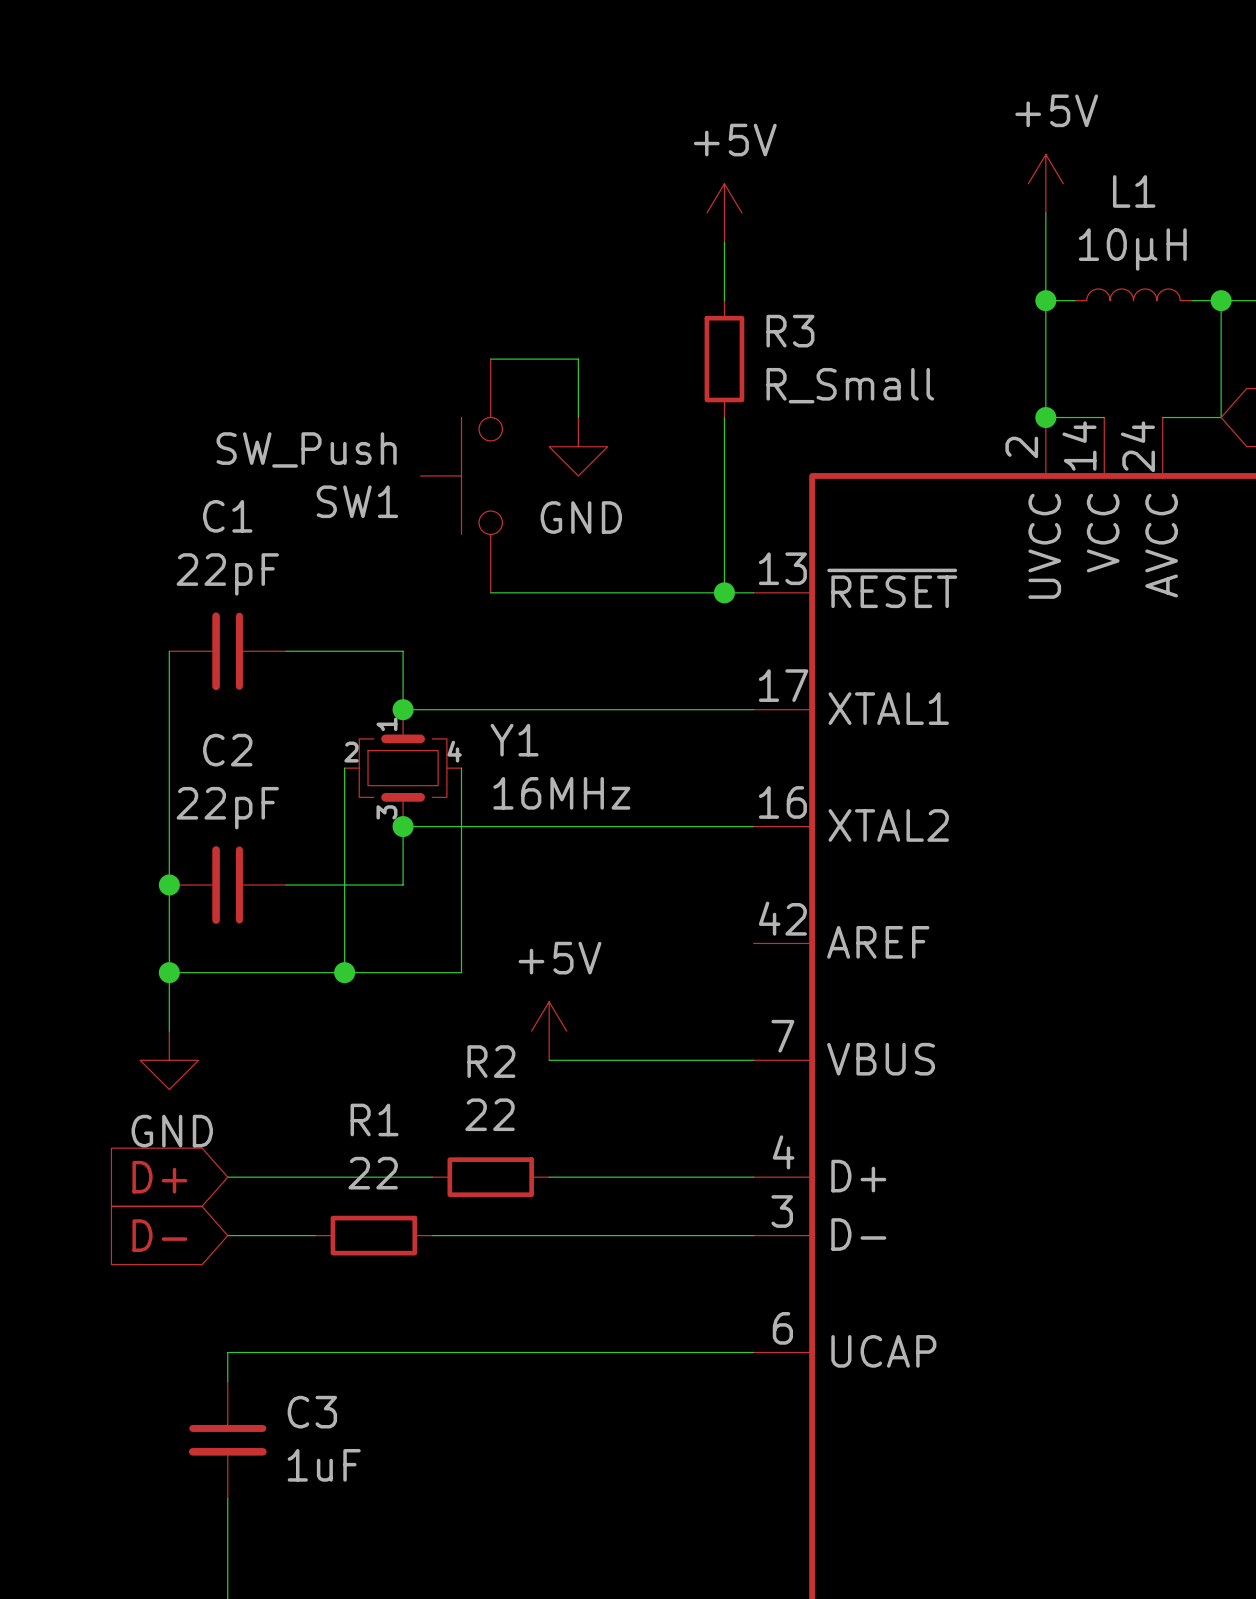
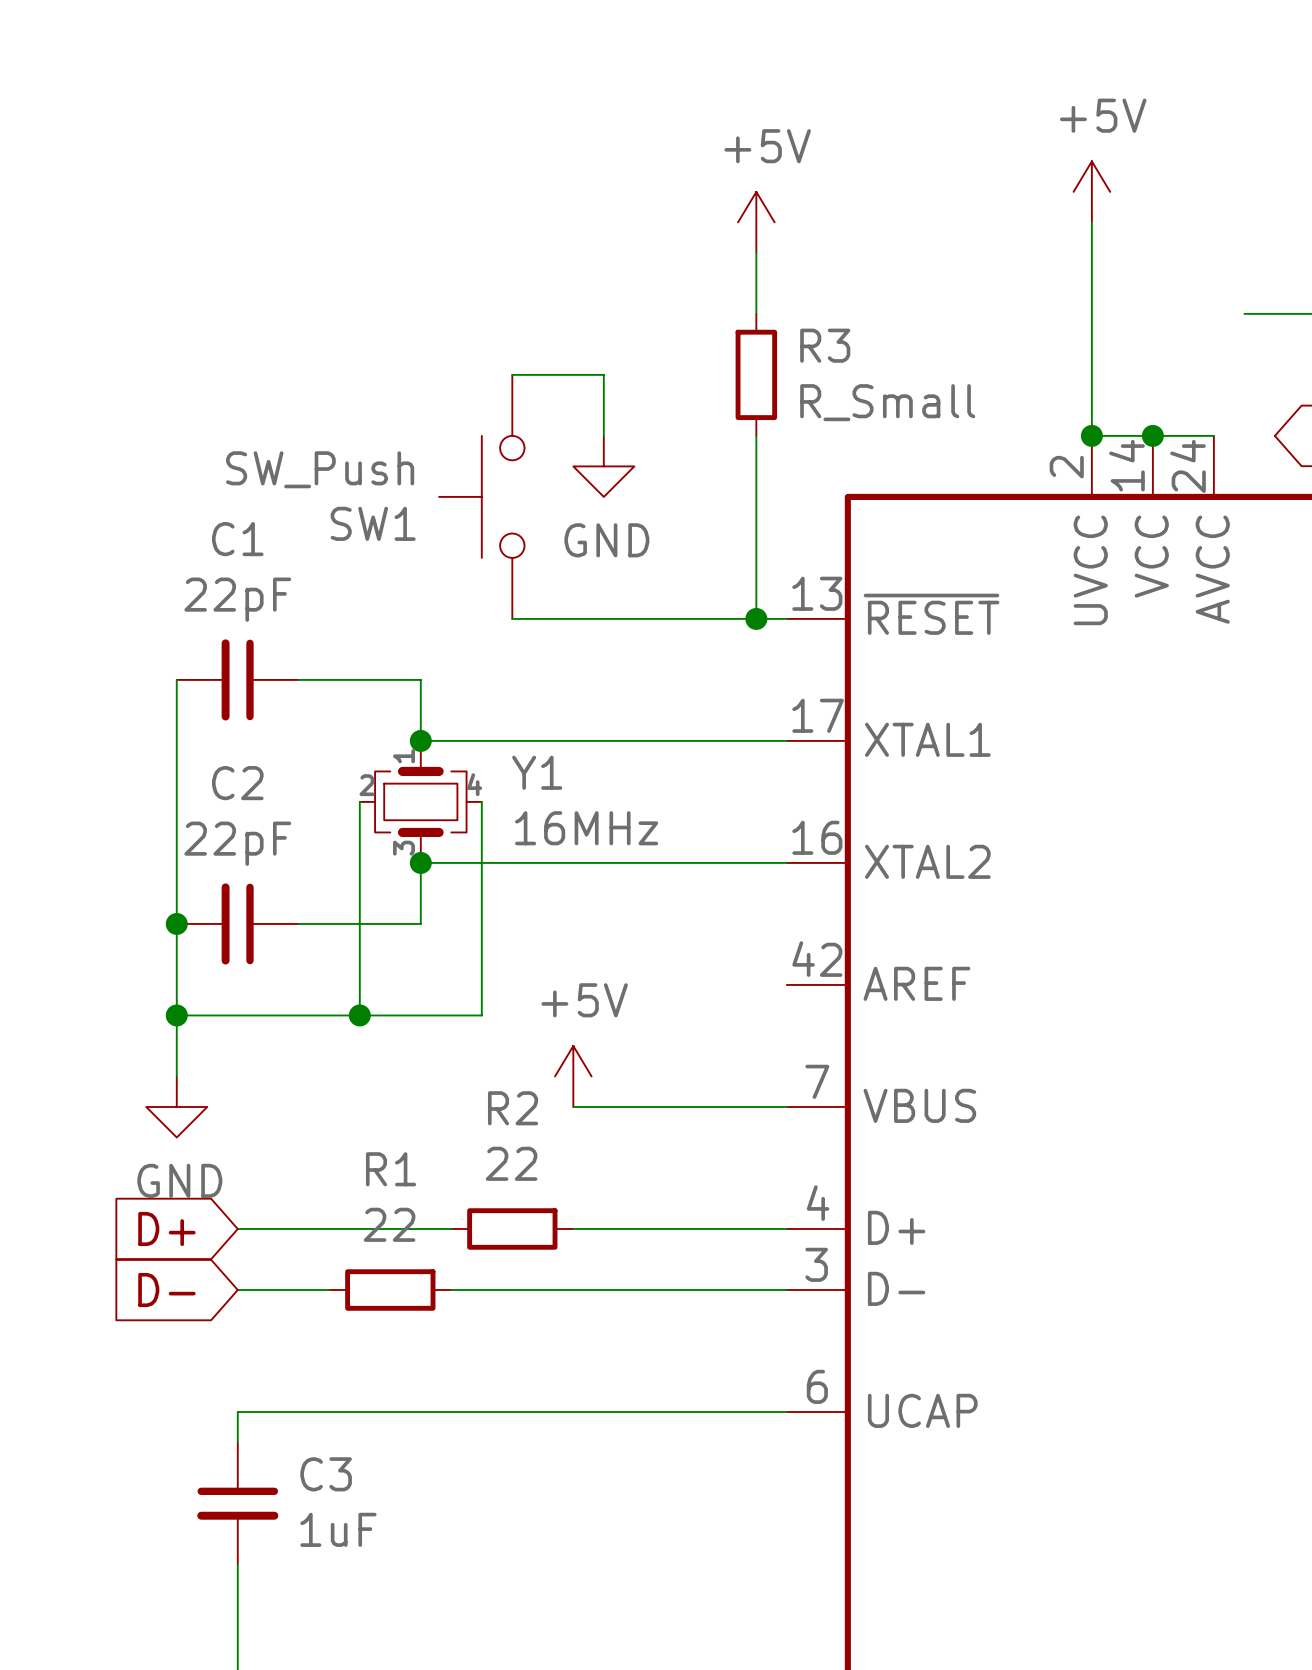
L1: 10μH (1133, 294) -> none
wire: (1045, 300) (1075, 300) -> none
junction: (1045, 300) -> none
wire: (1221, 300) (1221, 417) (1162, 417) -> (1152, 435) (1213, 435)
junction: (1221, 300) -> none
junction: none -> (1152, 435)

